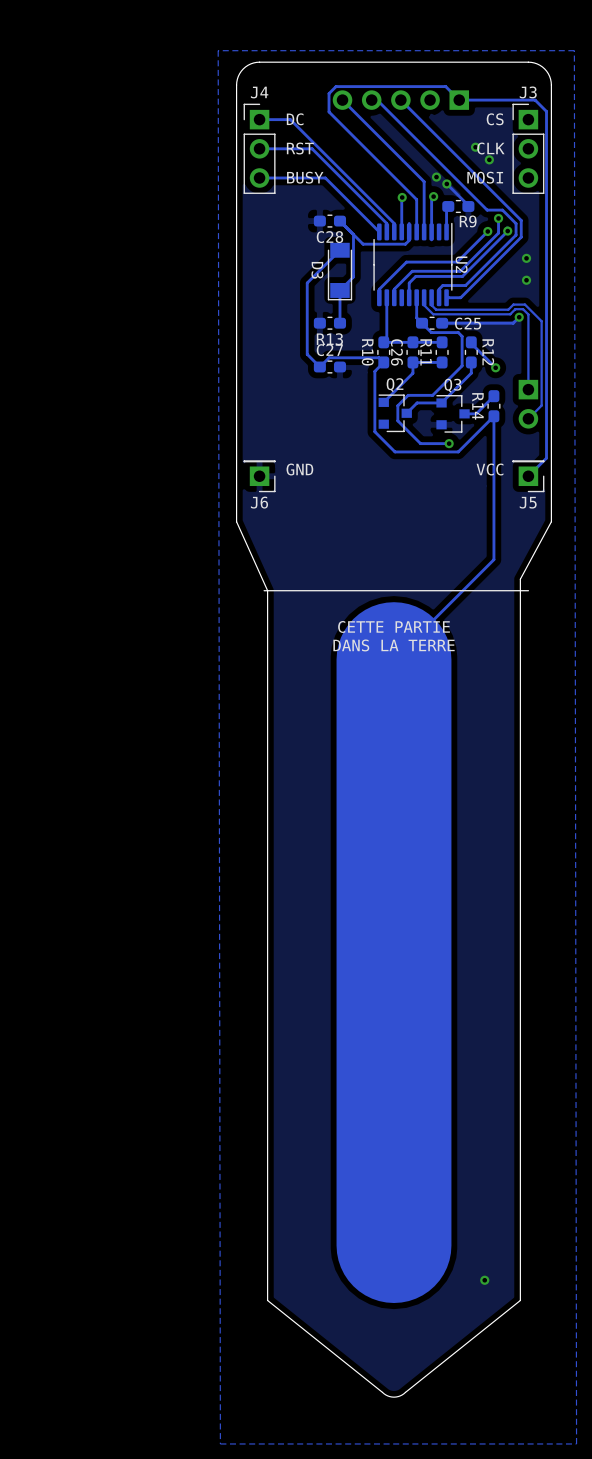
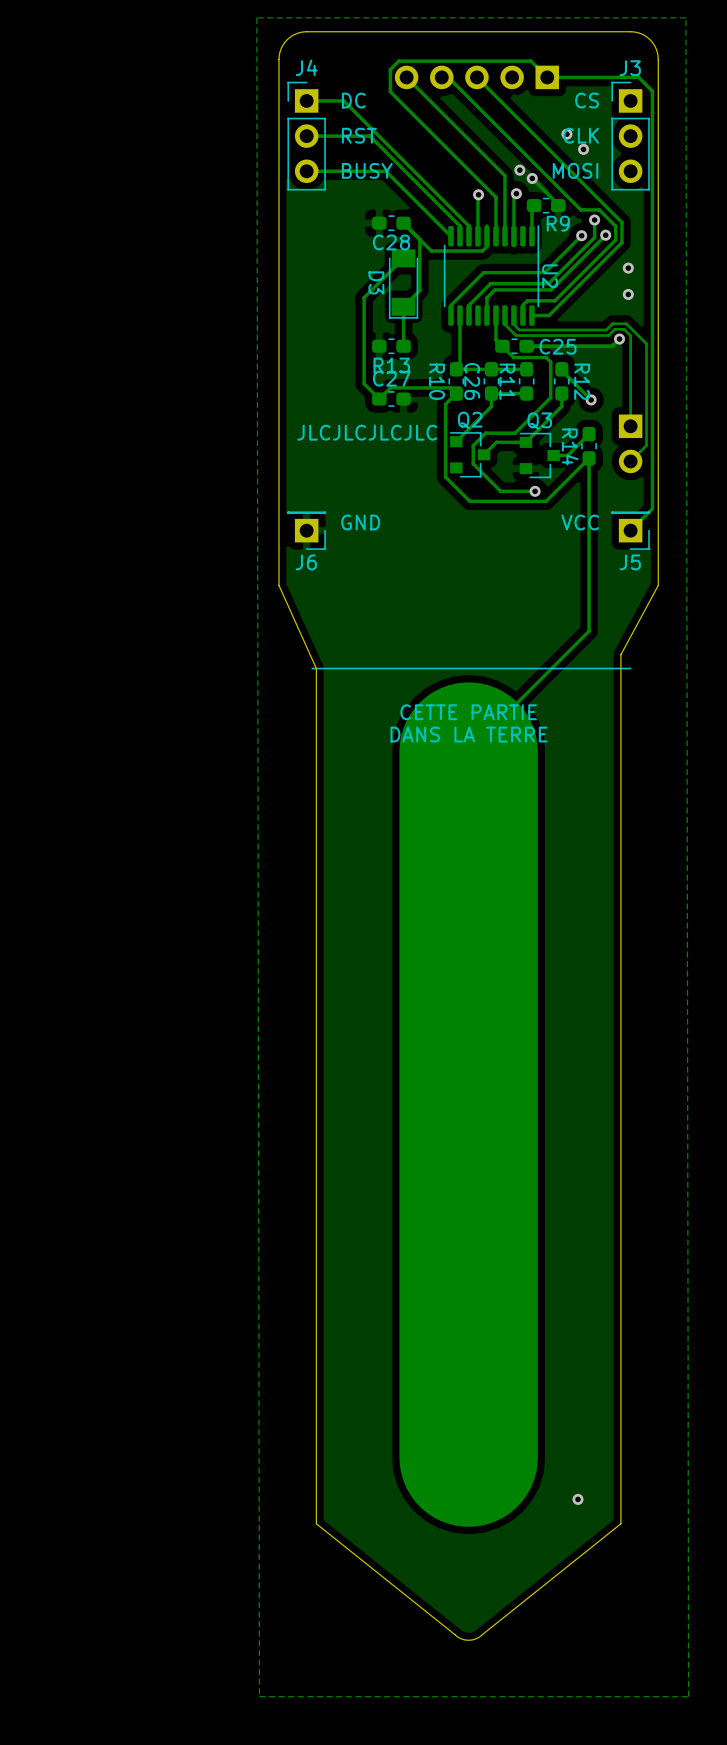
text: none -> JLCJLCJLCJLC (367, 432)

